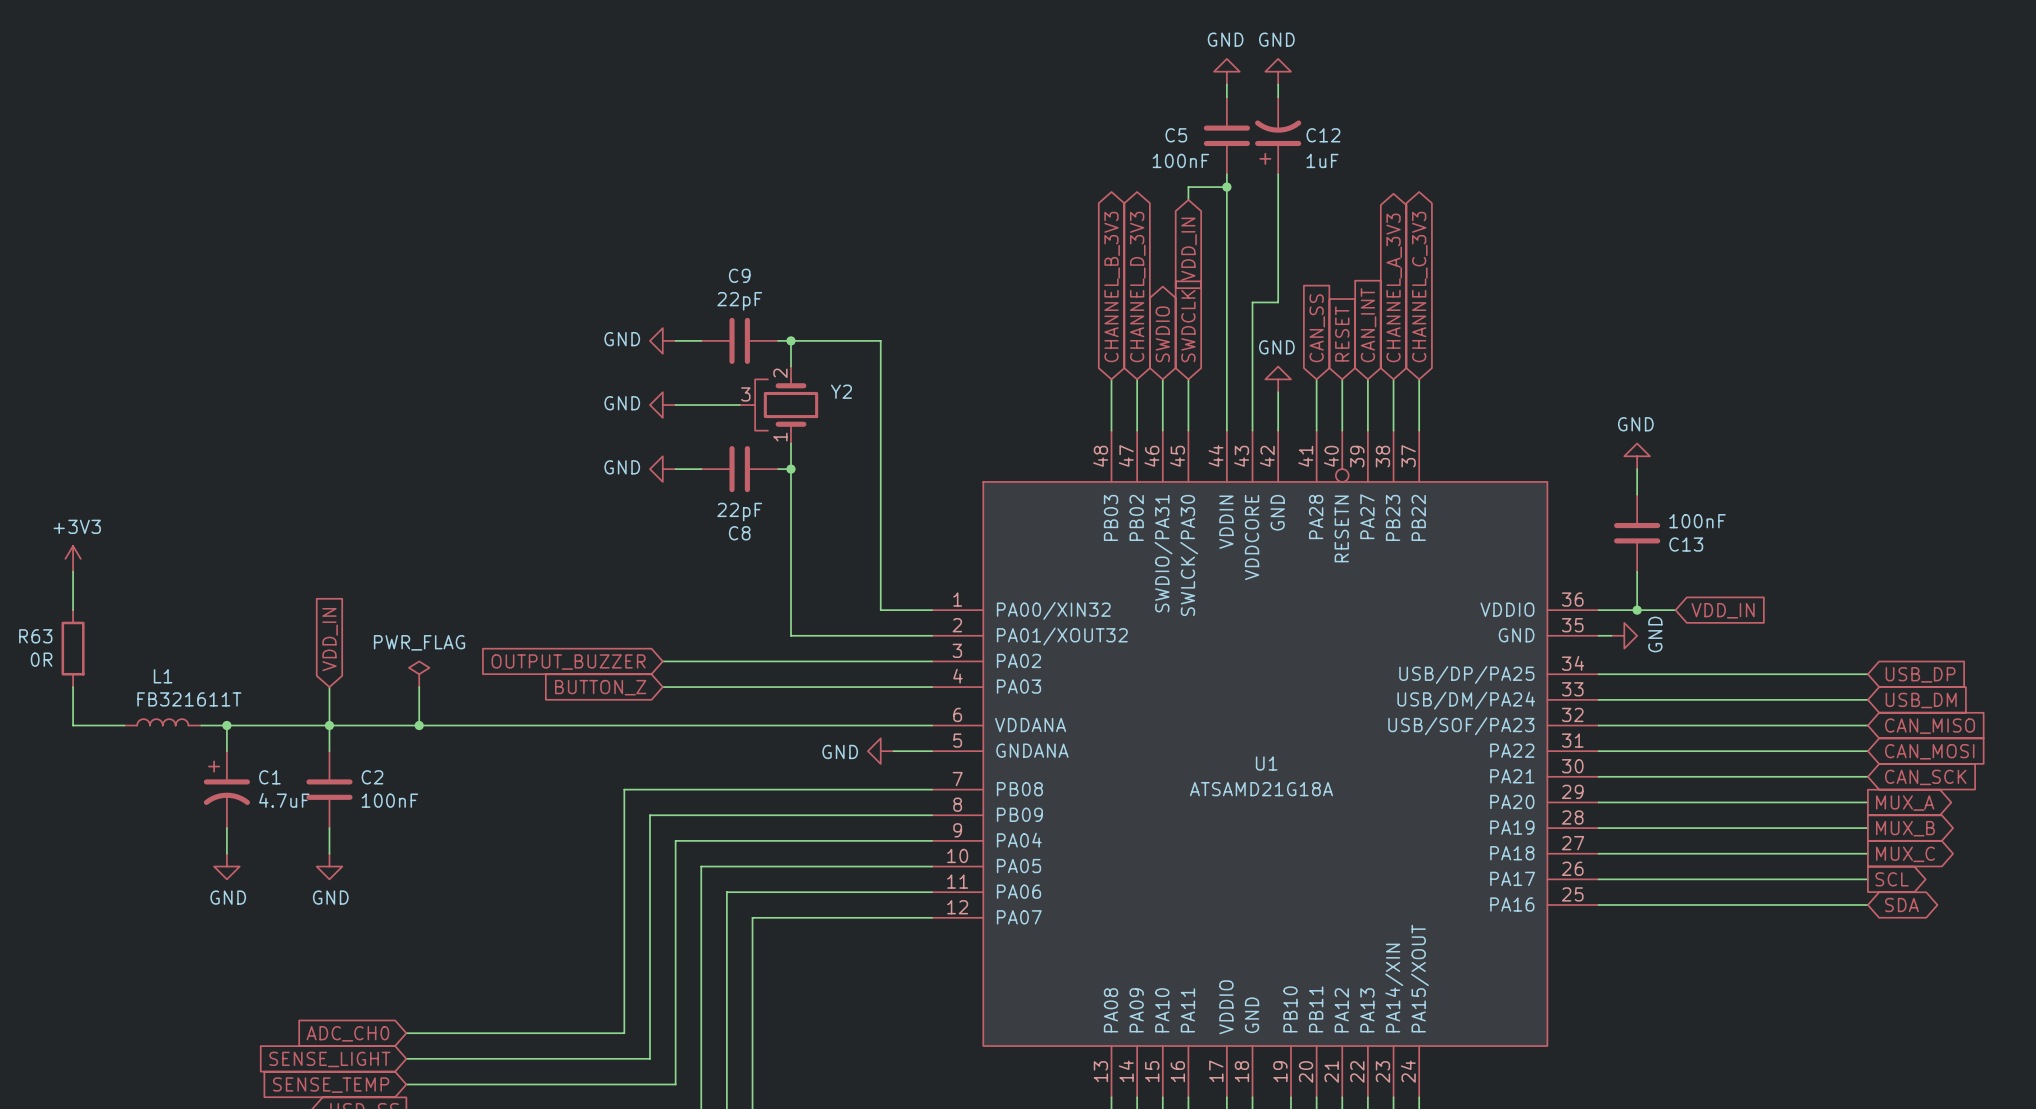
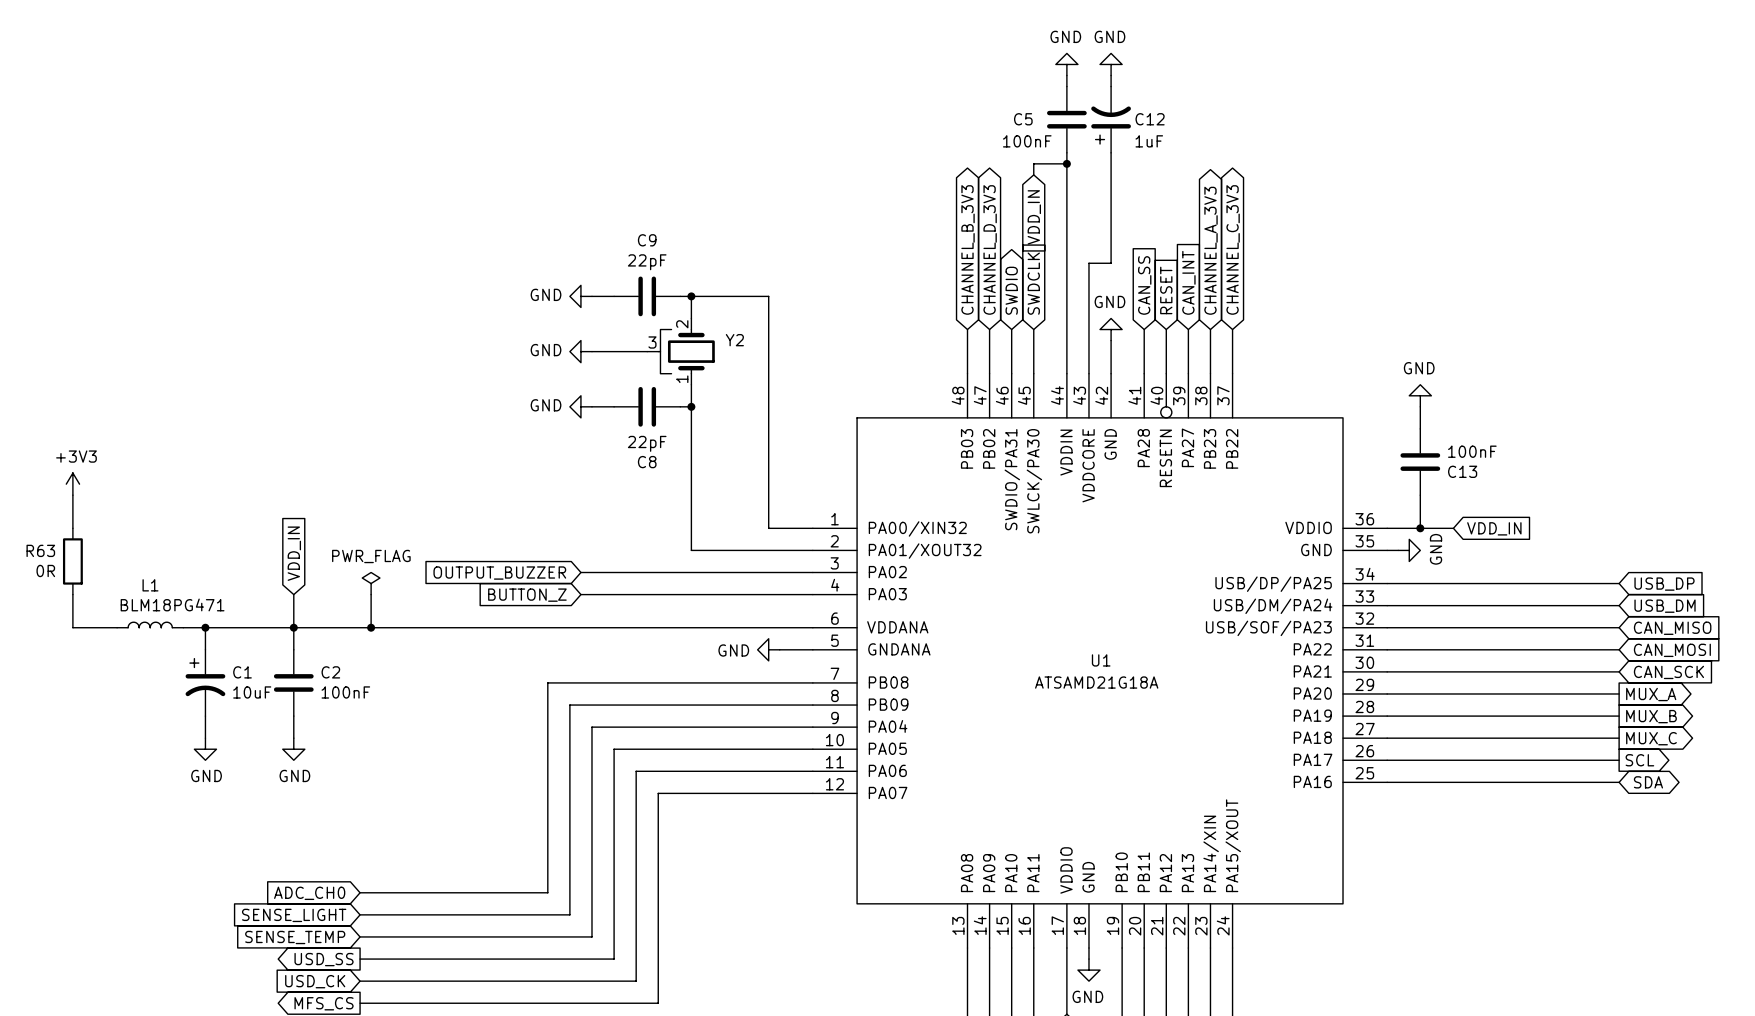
L1 value: FB321611T (189, 699) -> BLM18PG471 (172, 604)
C1 value: 4.7uF (284, 800) -> 10uF (252, 692)

